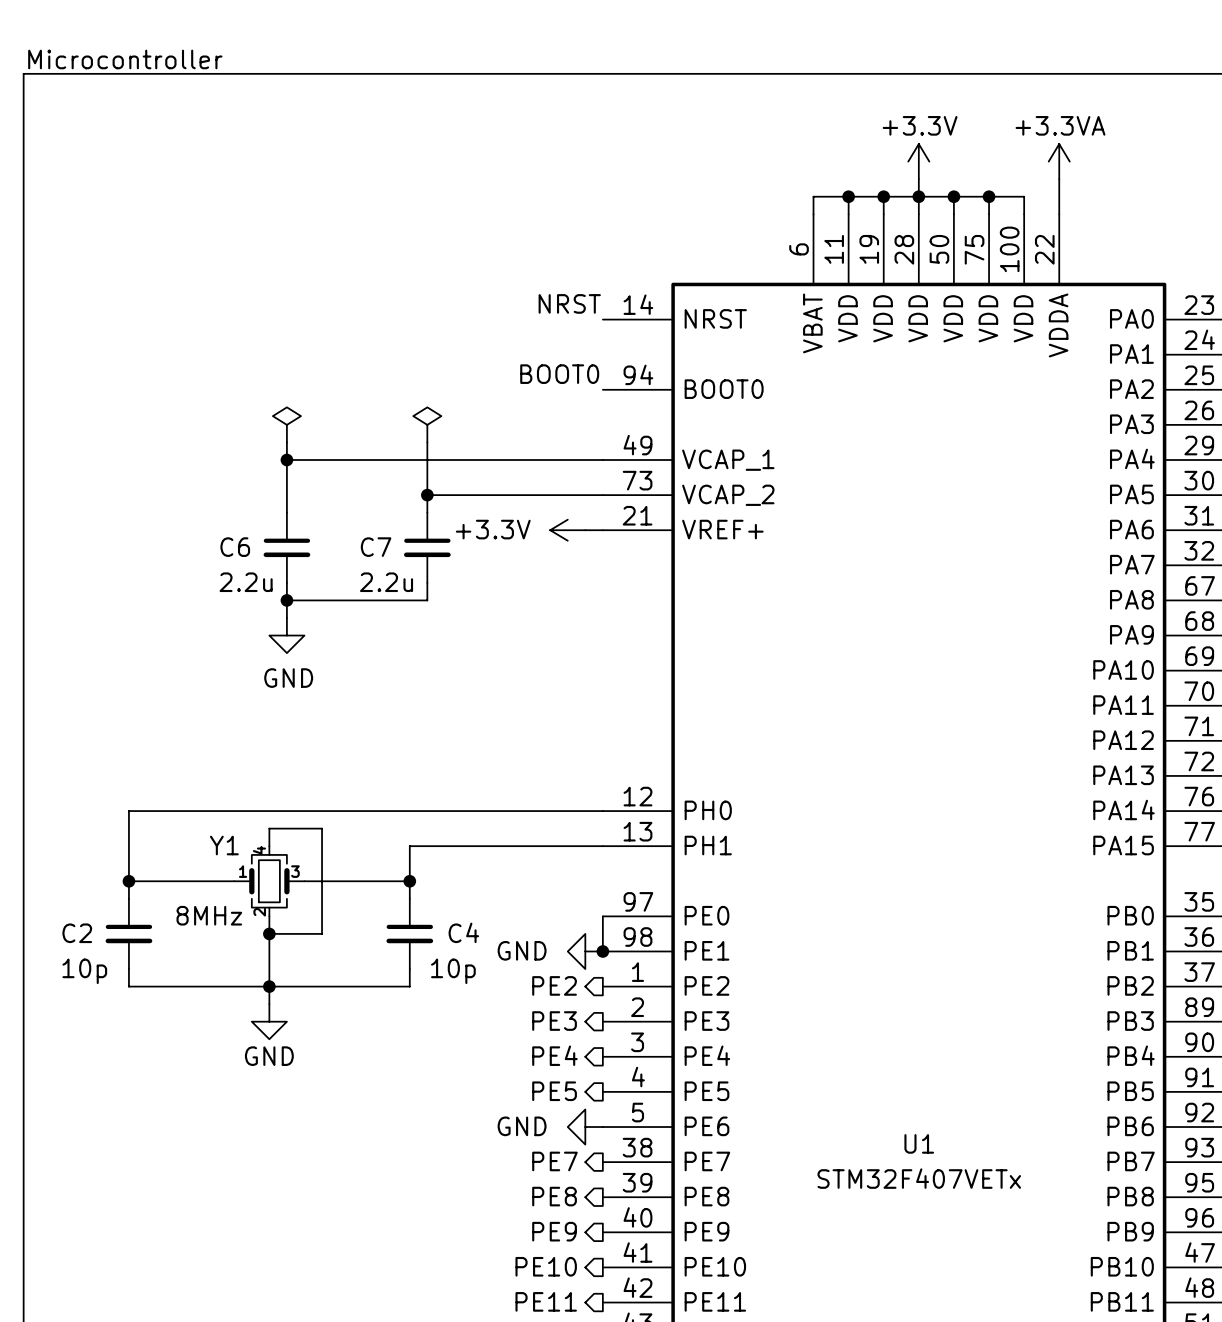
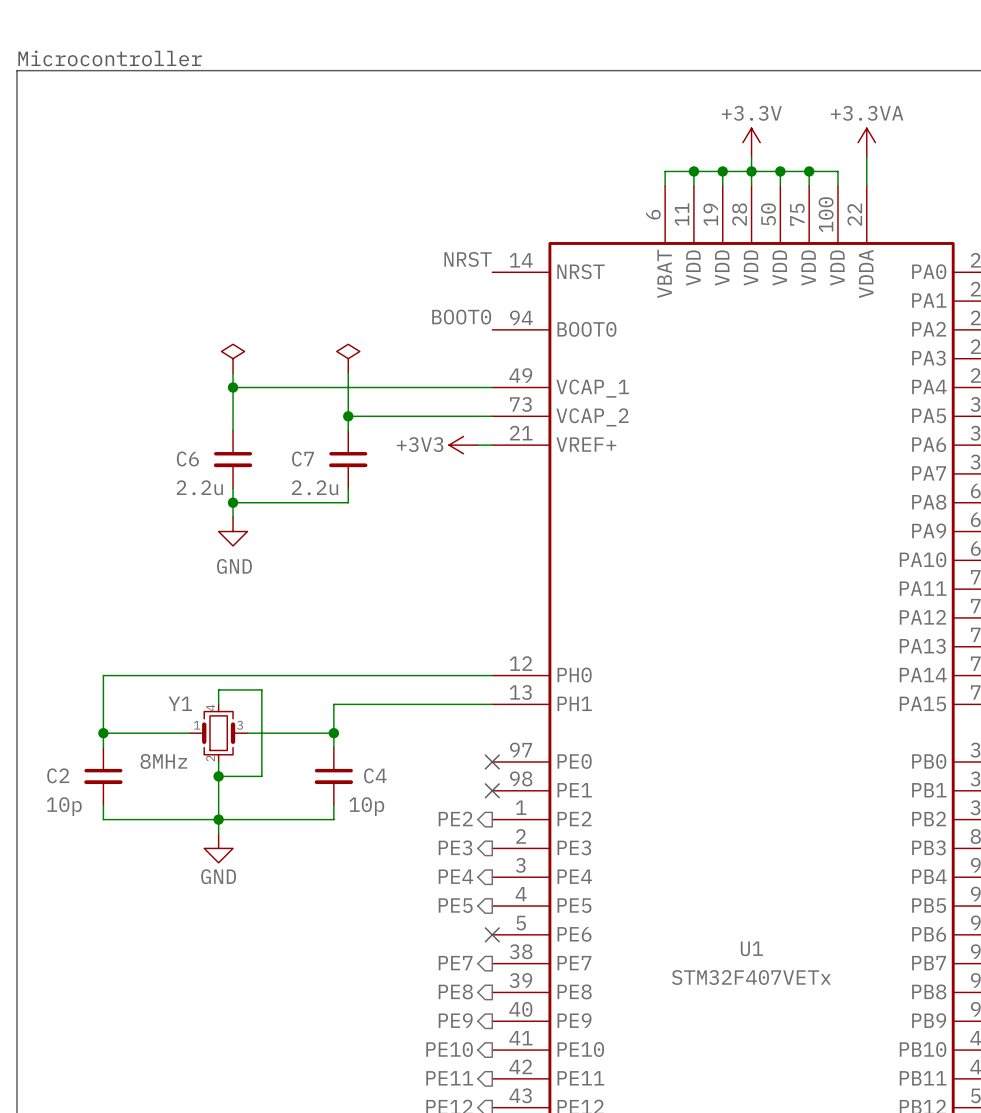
power symbol: +3.3V (567, 530) -> +3V3 (463, 445)
wire: (602, 916) (602, 951) -> none
no-connect mark: none -> (492, 761)
power symbol: GND (585, 951) -> none
junction: (602, 951) -> none
no-connect mark: none -> (492, 790)
power symbol: GND (585, 1127) -> none
no-connect mark: none -> (492, 934)

